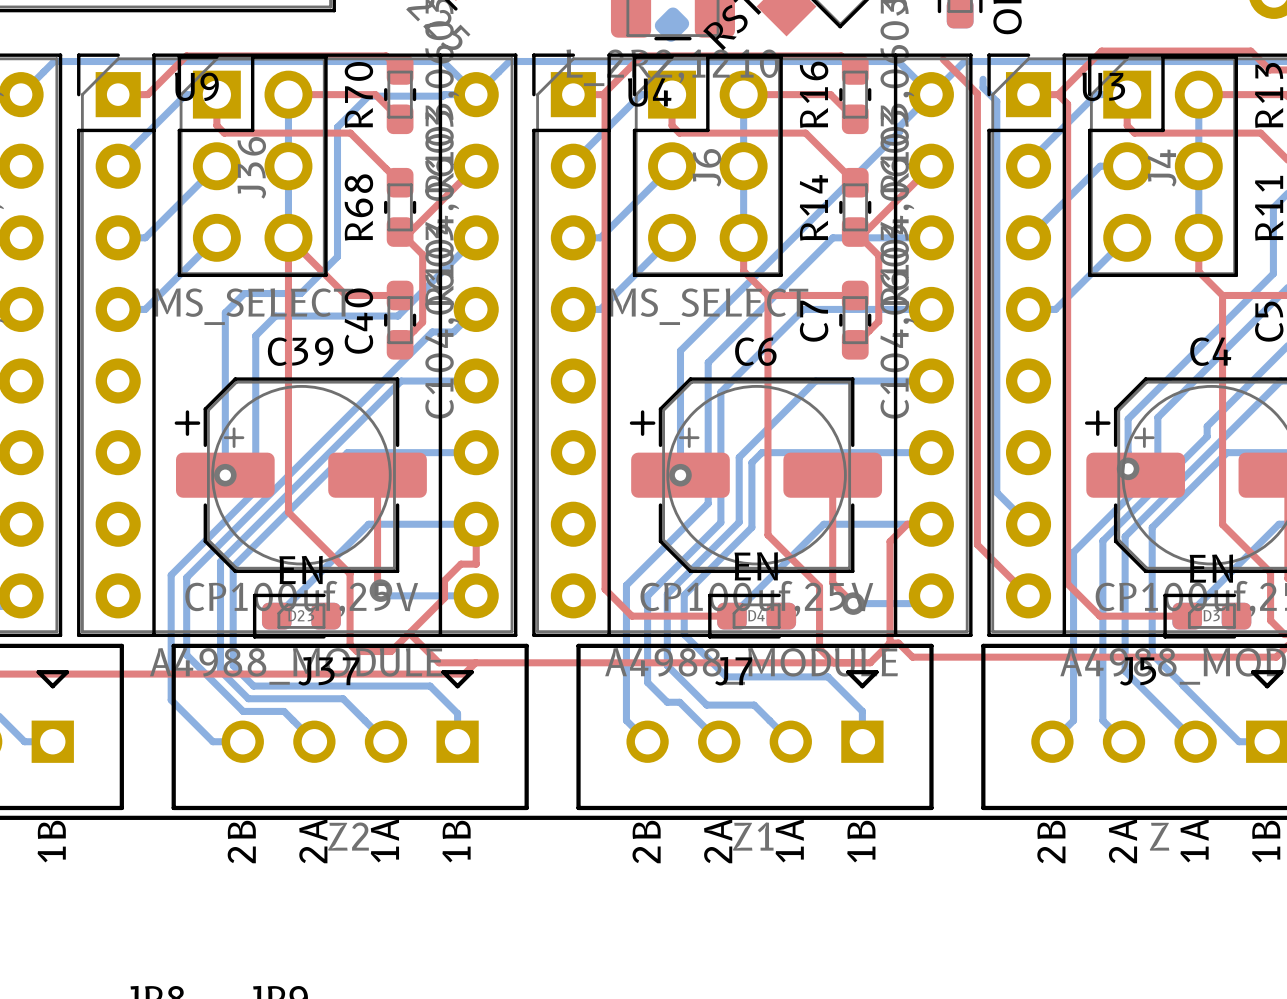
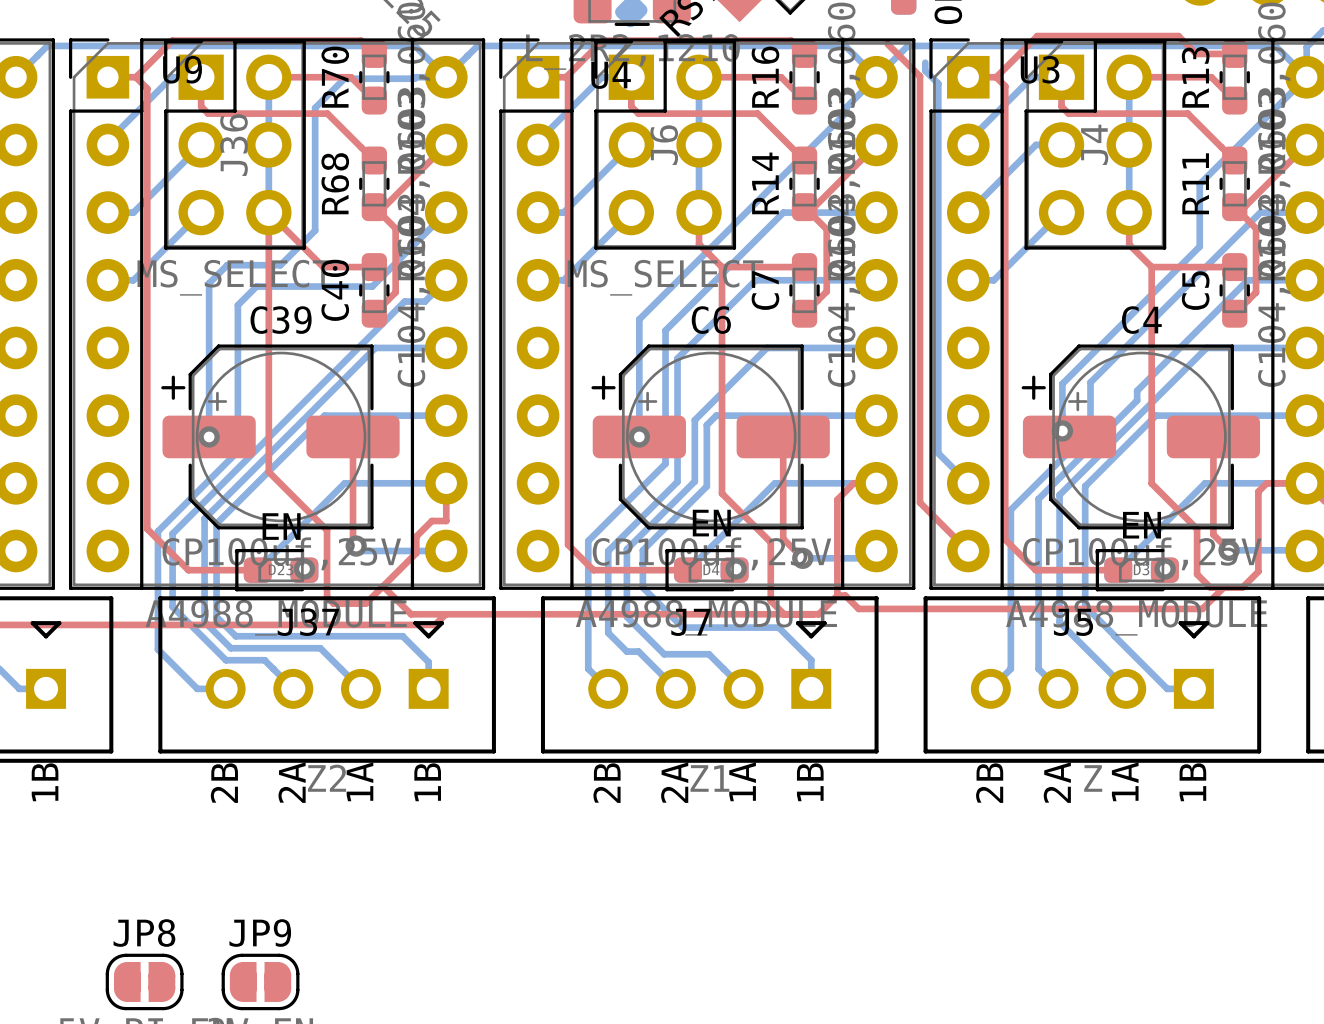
top track: none -> (135, 77) (147, 88) (147, 529) (188, 570) (257, 570)
via: none -> (304, 568)
via: none -> (736, 568)
via: none -> (1165, 568)

